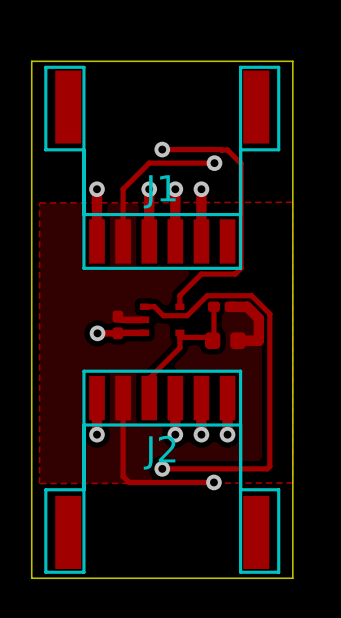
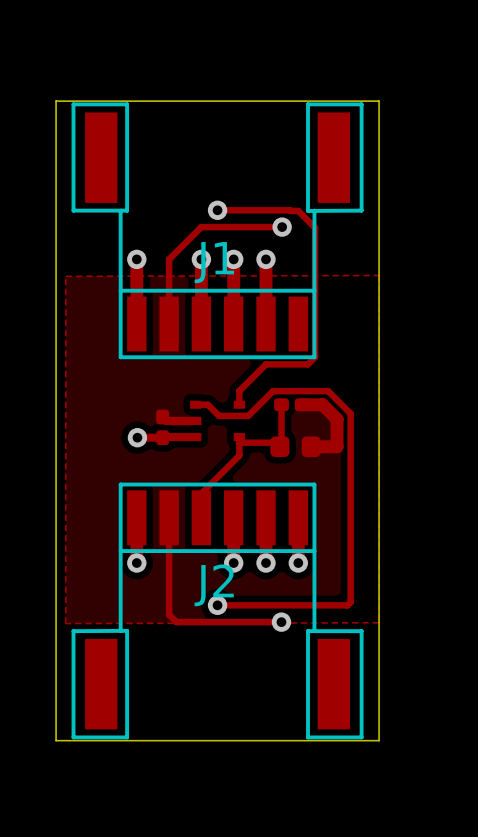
J1 footprint: [44, 65, 281, 270] -> [71, 102, 364, 360]
J2 footprint: [44, 369, 281, 574] -> [71, 482, 364, 740]

